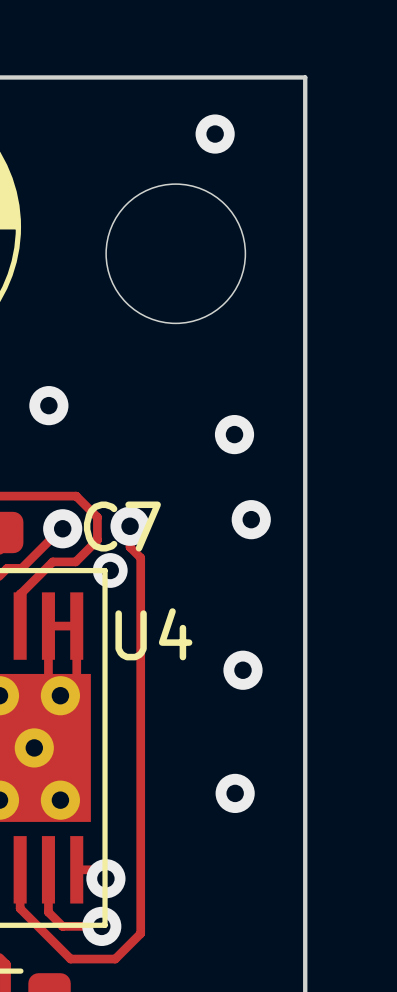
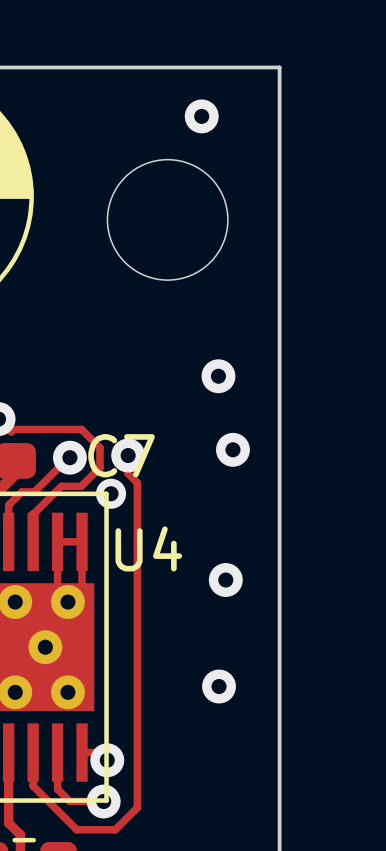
via: (48, 405) -> none

